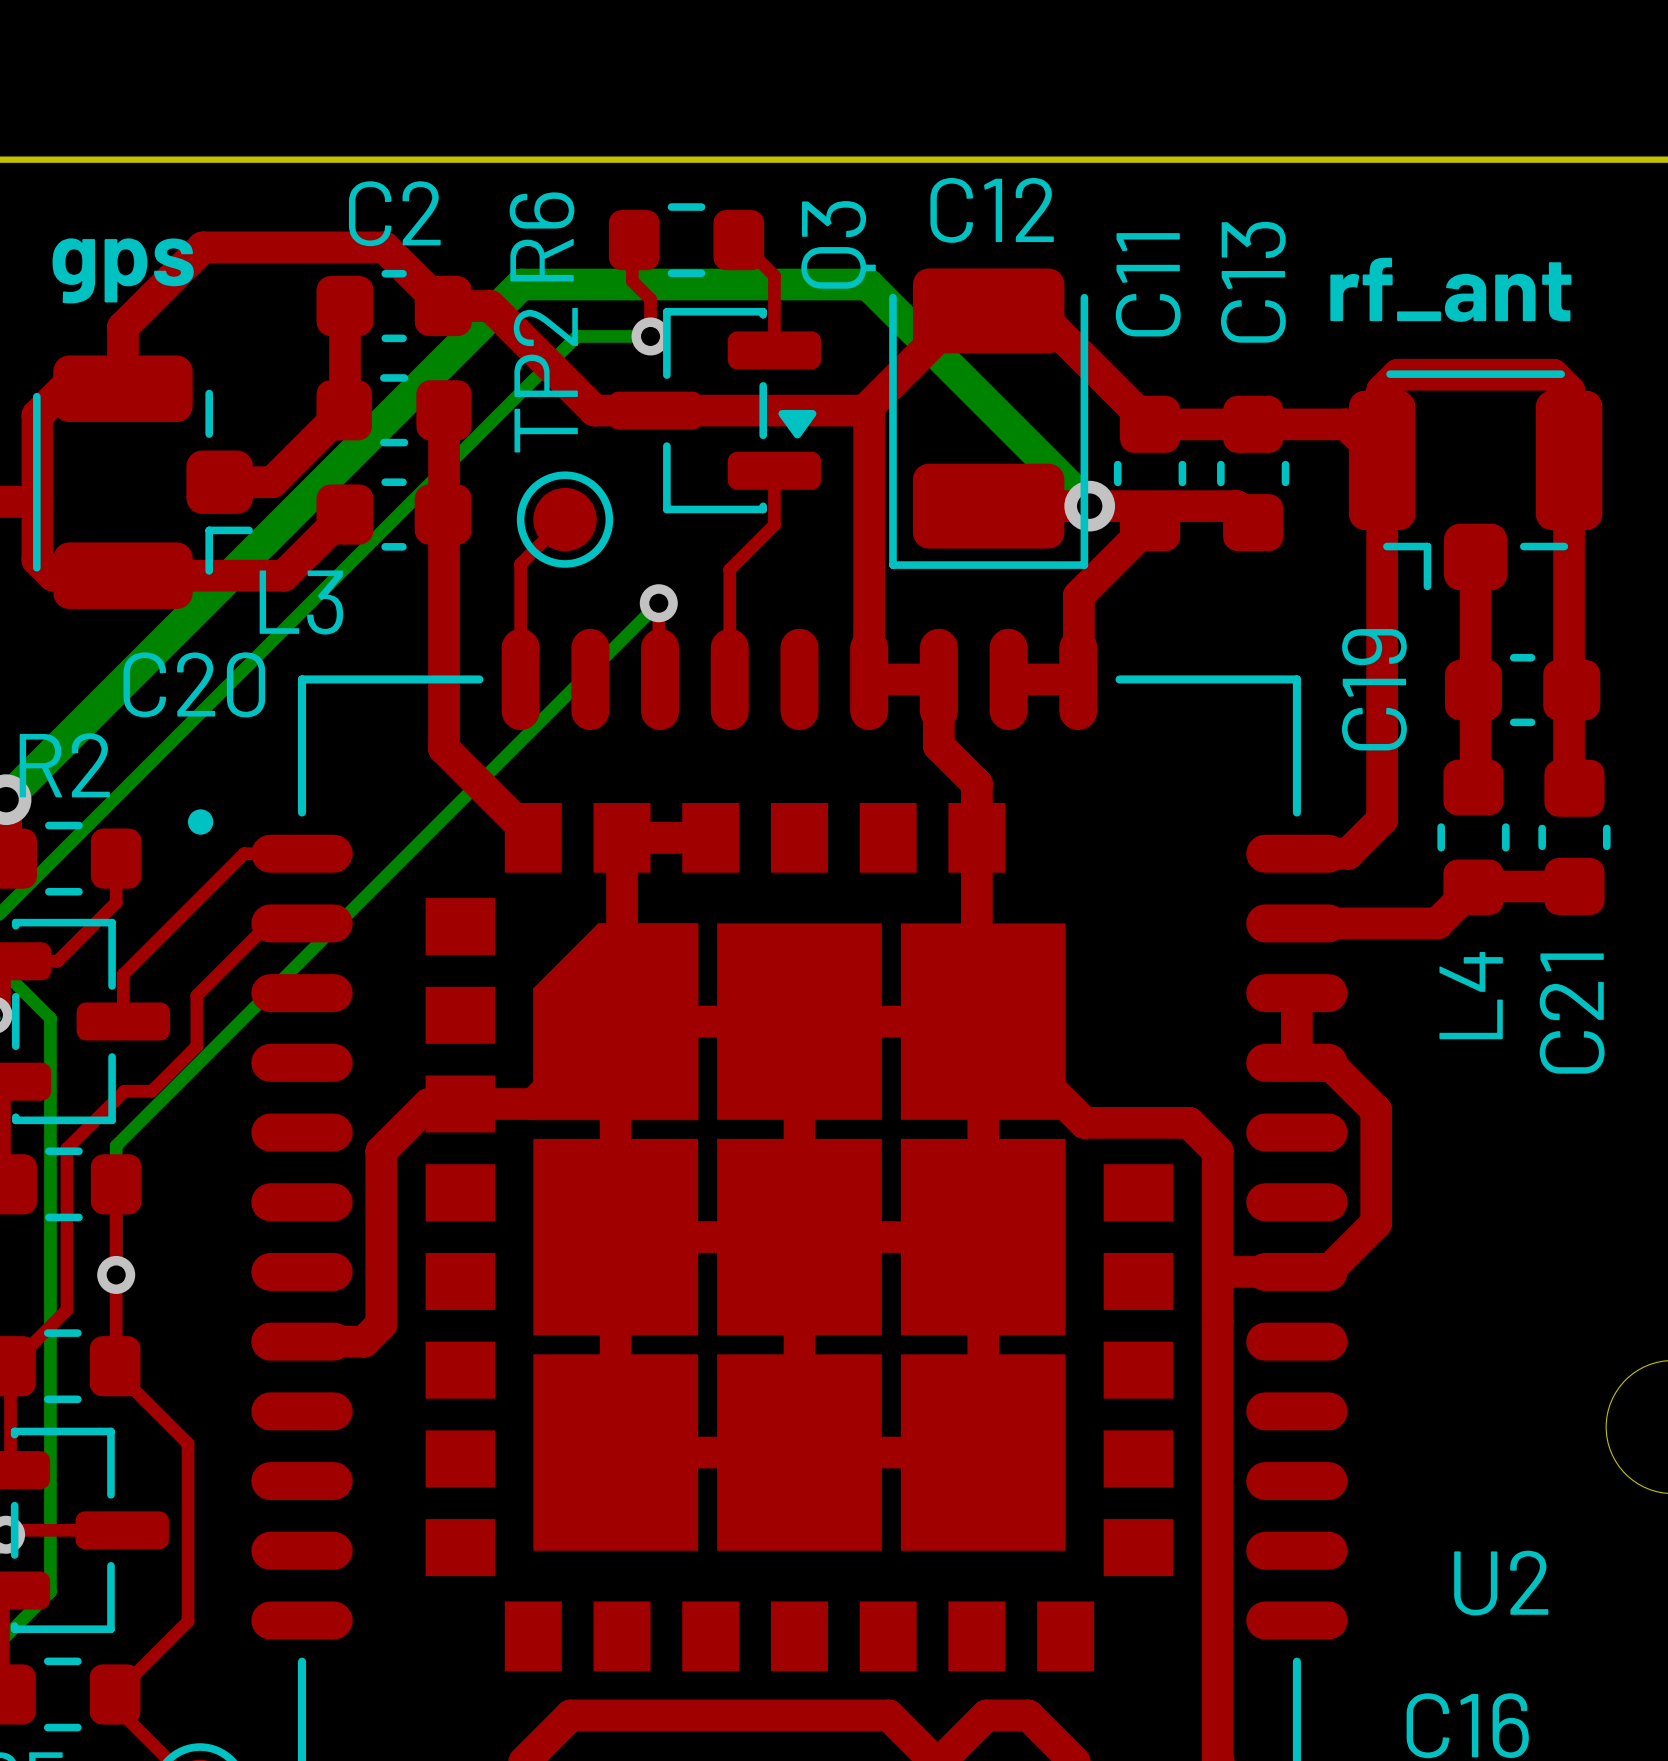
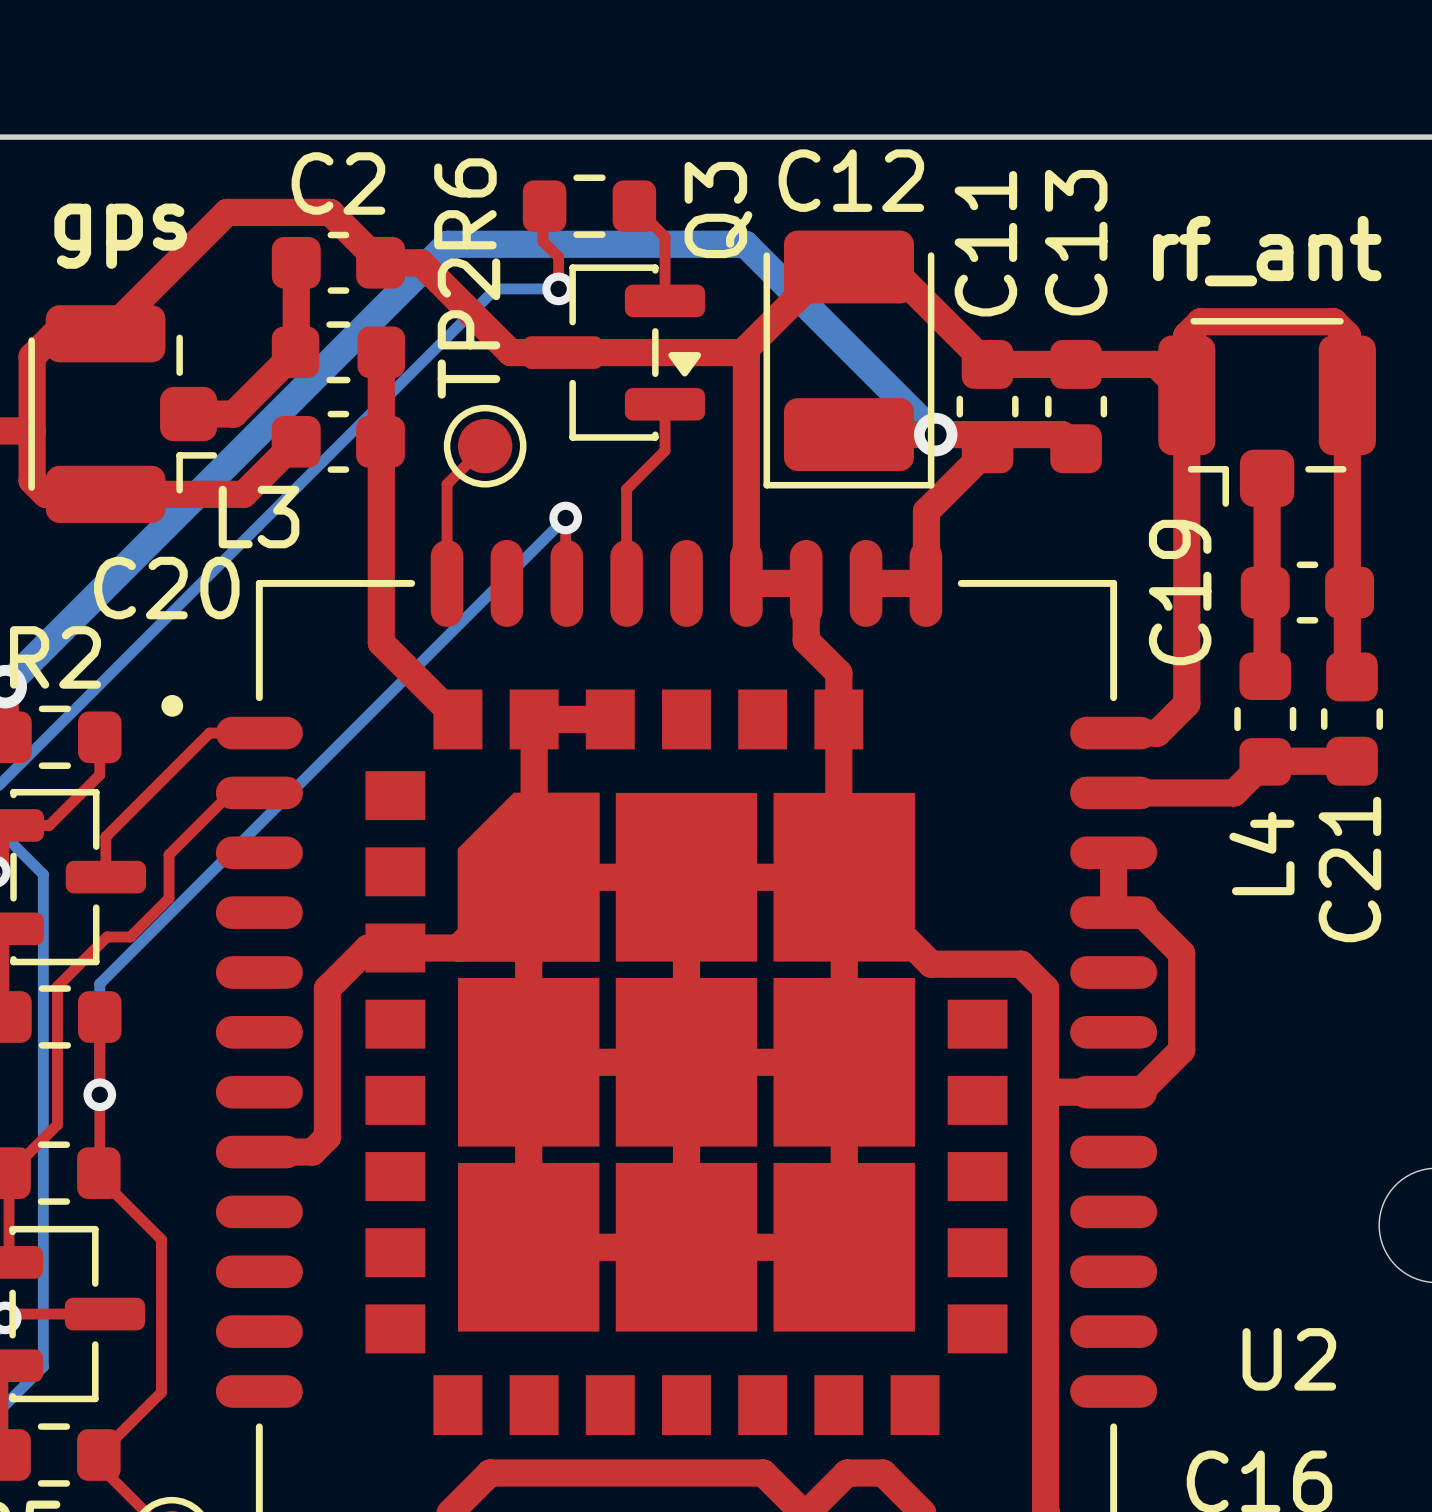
top track: (264, 247) (202, 247) (123, 327) (123, 388) -> (227, 212) (105, 333)

